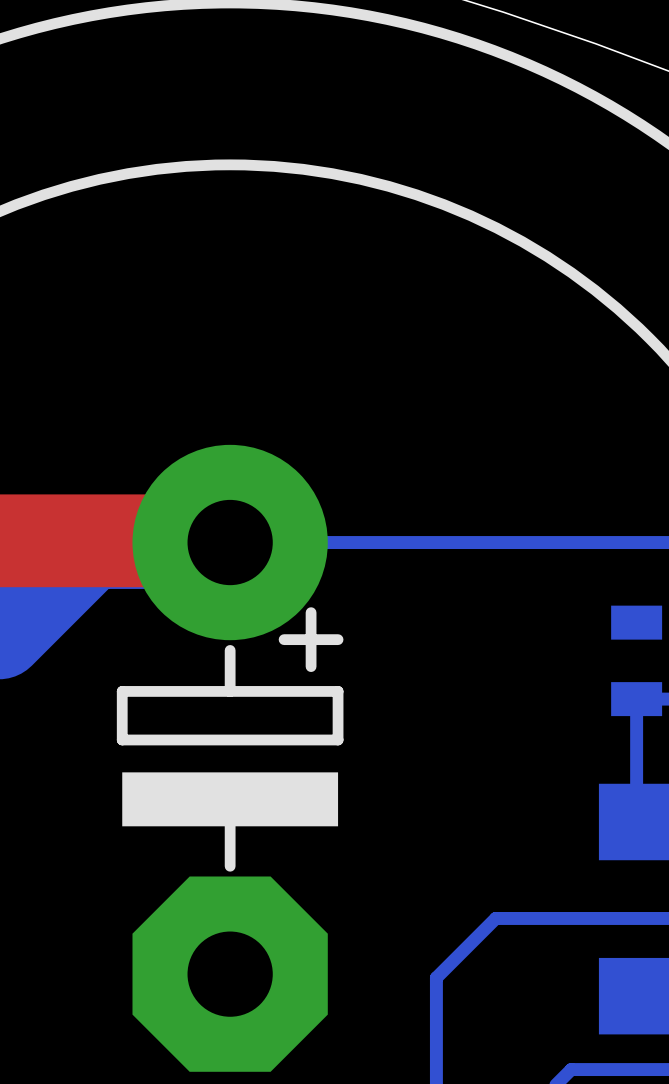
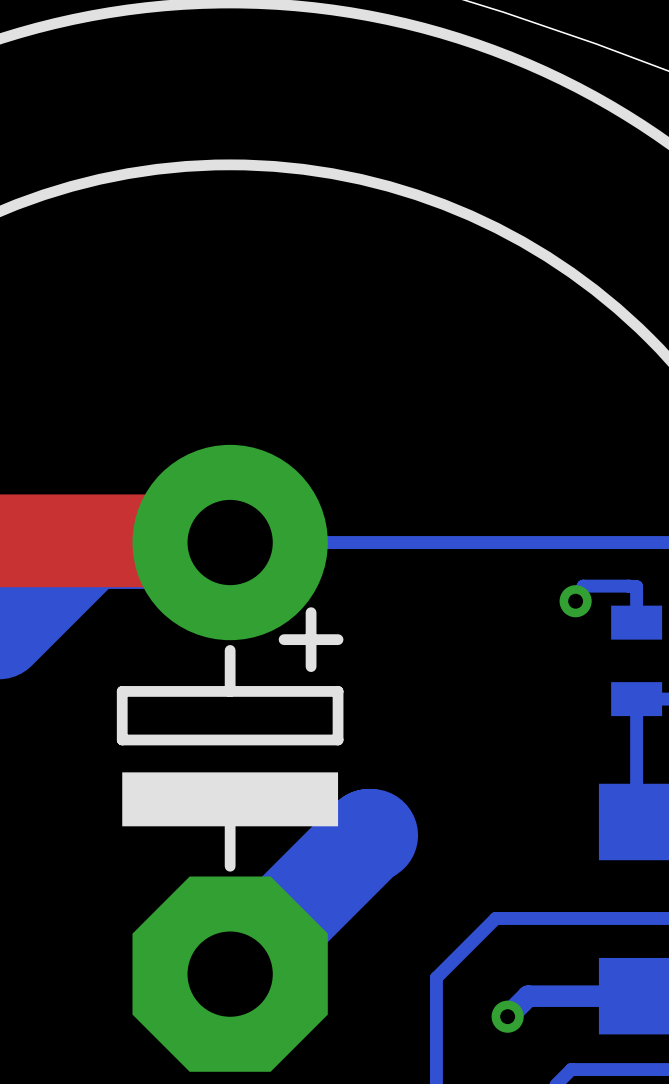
bottom track: none -> (575, 601) (583, 586) (636, 586) (636, 622)
via: none -> (575, 601)
bottom track: none -> (371, 835) (368, 835) (230, 974)
bottom track: none -> (635, 996) (528, 996) (507, 1016)
via: none -> (507, 1016)

